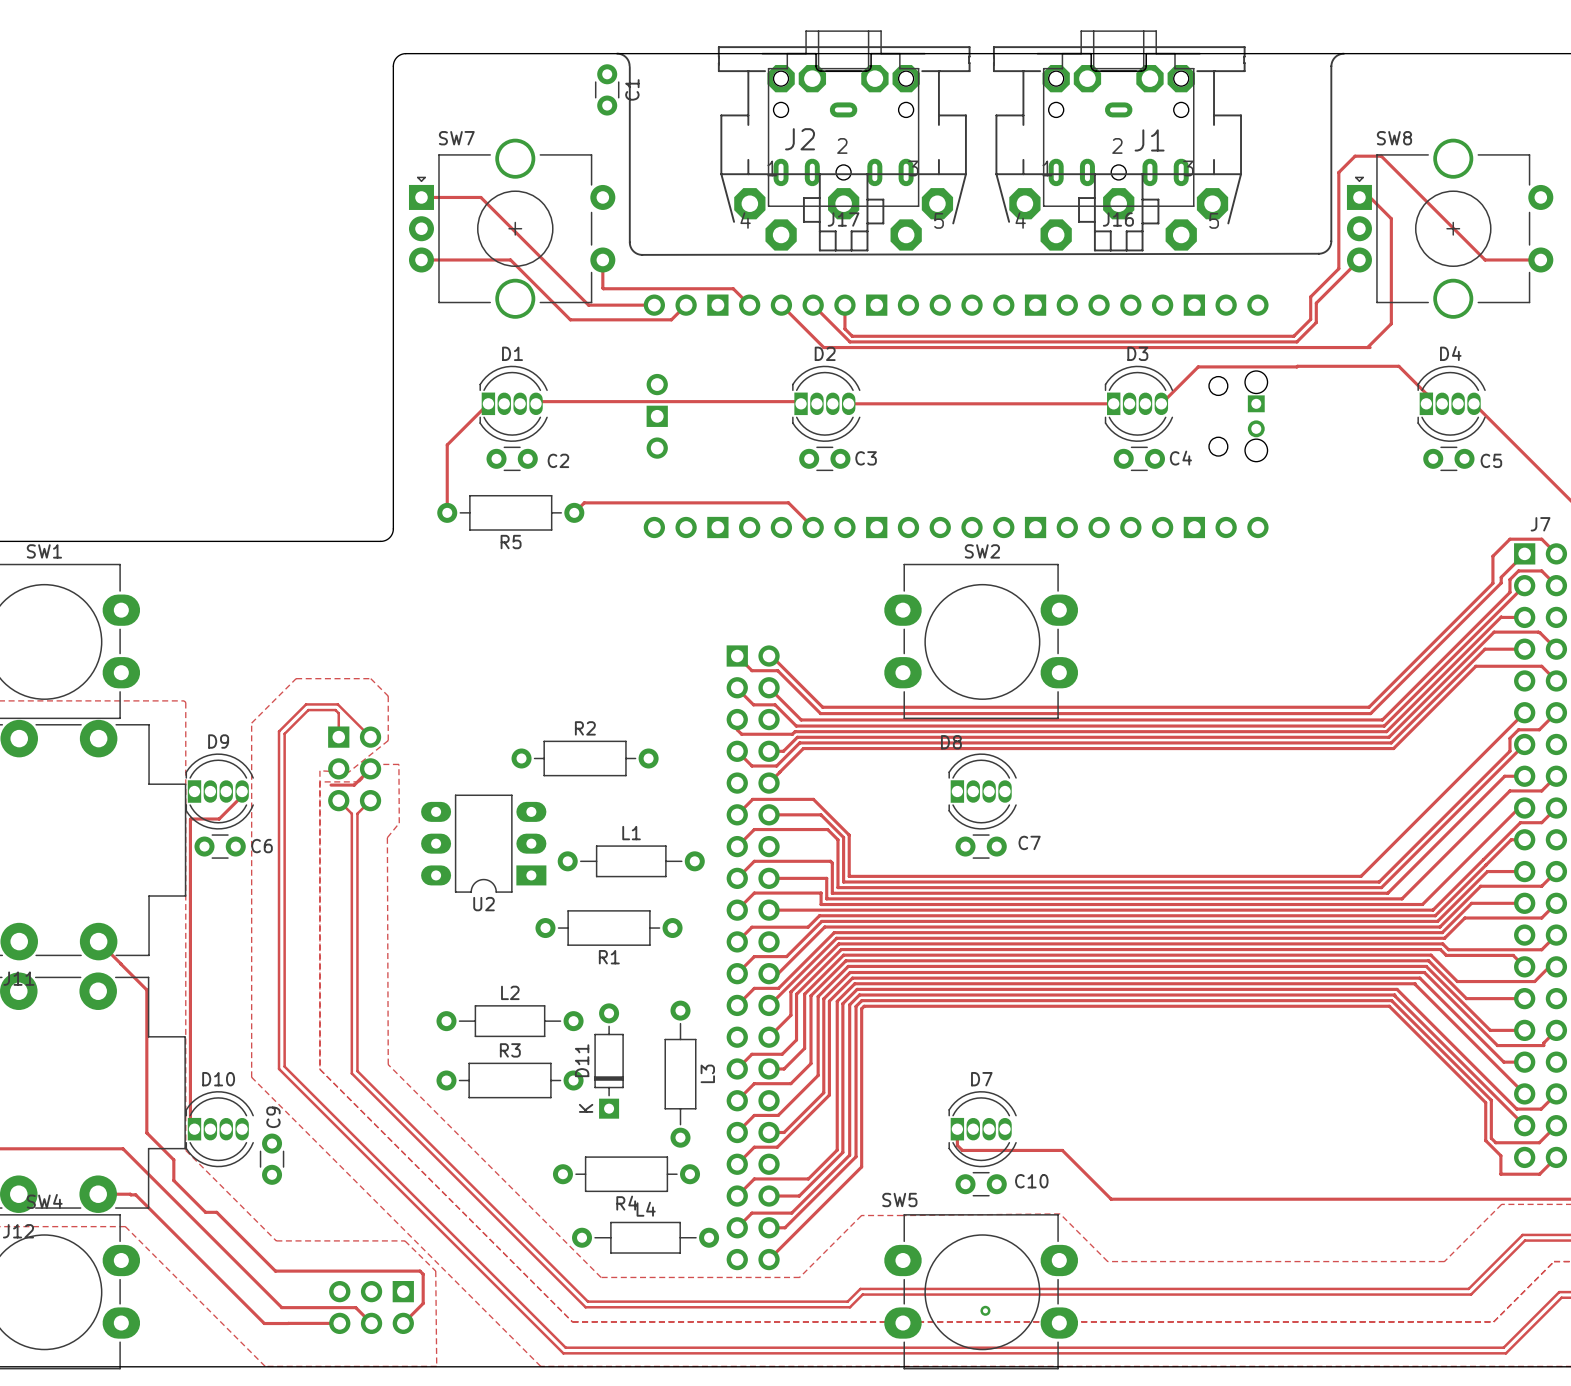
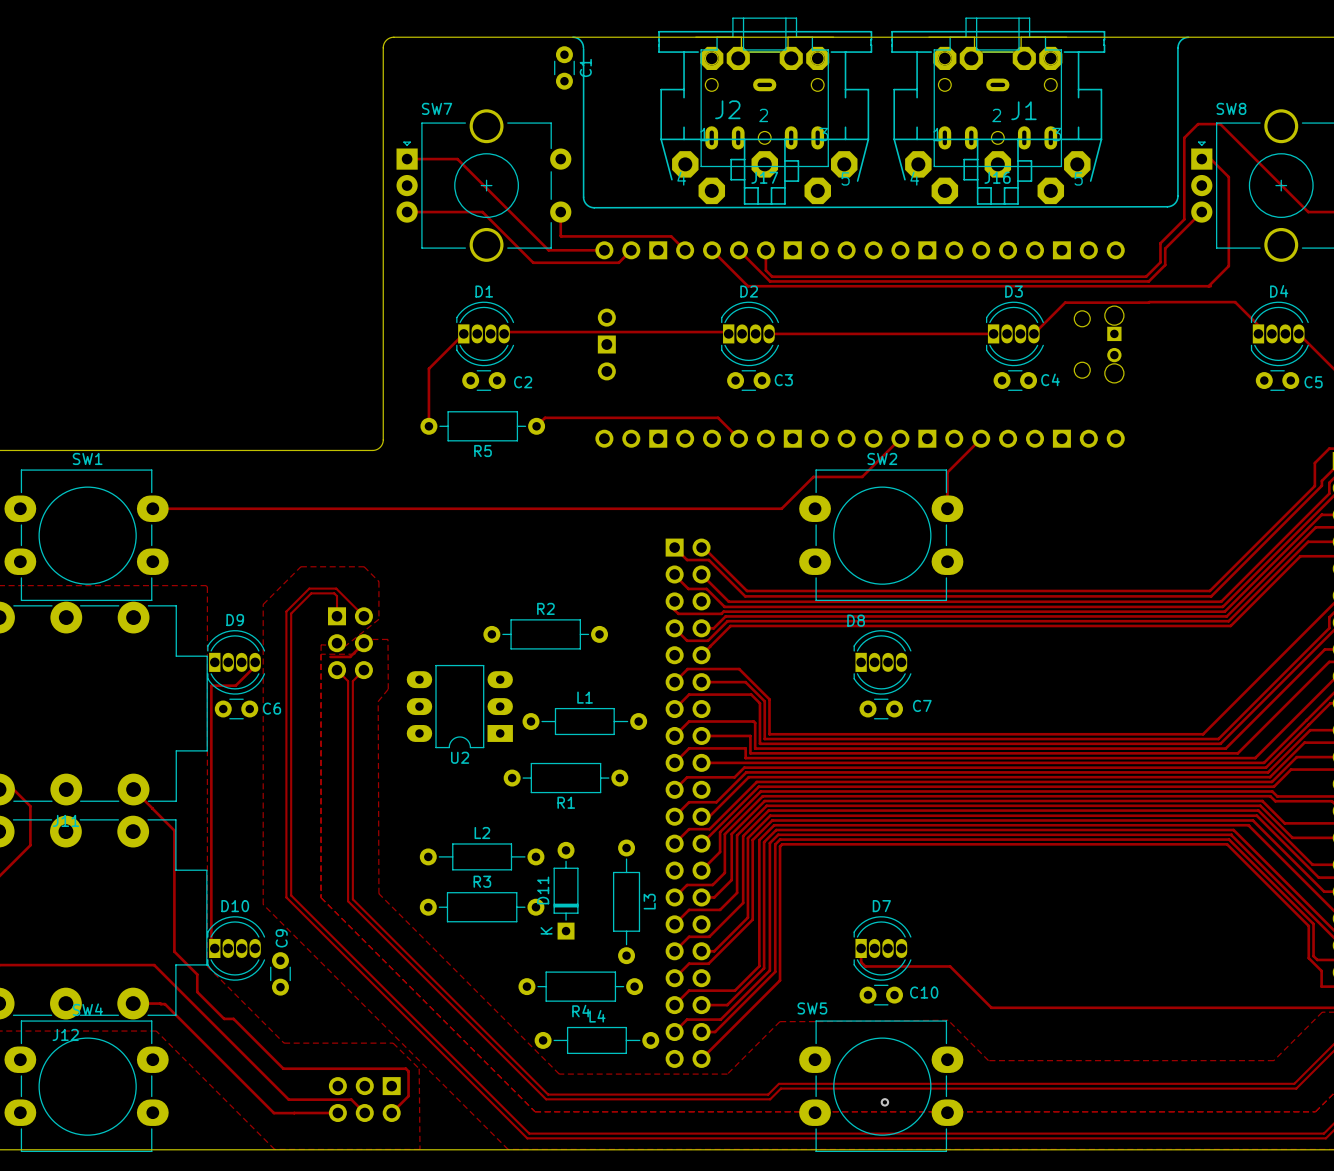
track: none -> (900, 438) (862, 476) (813, 476) (781, 508) (152, 508)
track: none -> (981, 438) (947, 472) (947, 508)

